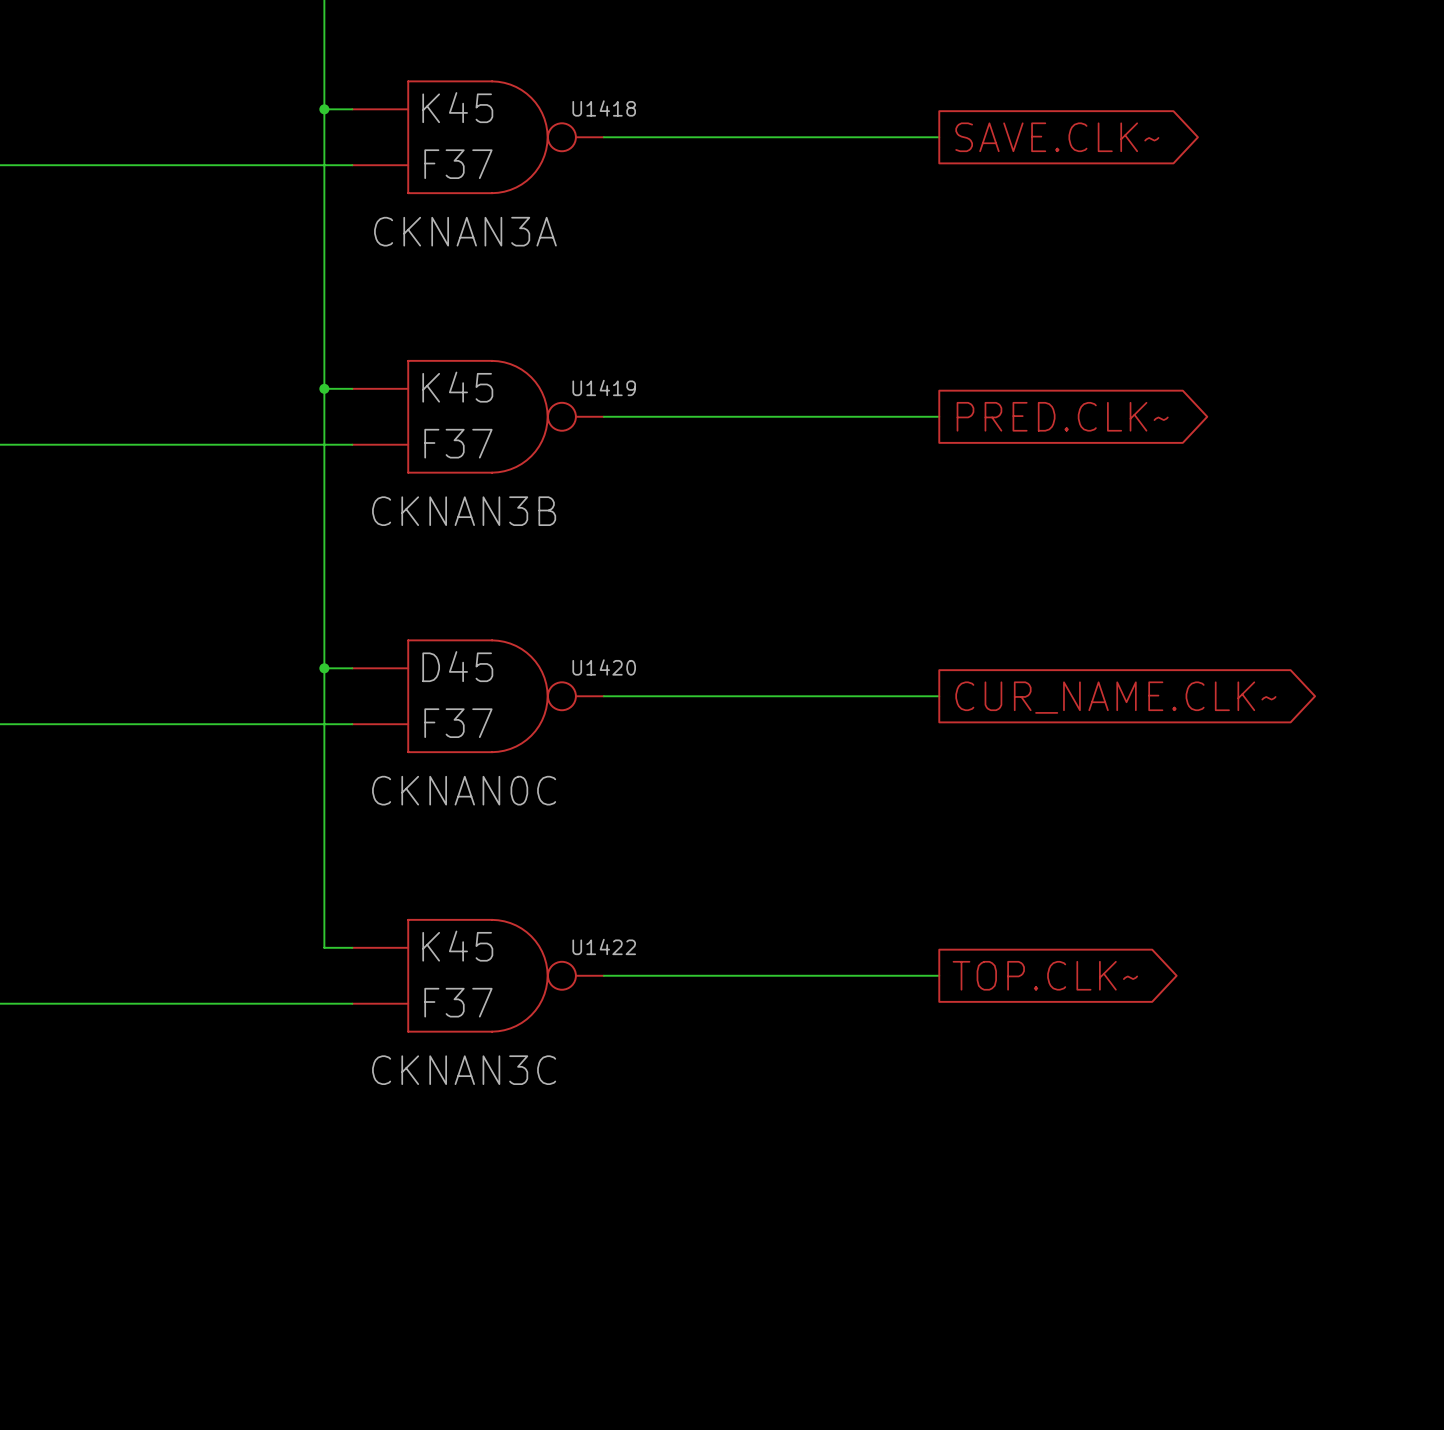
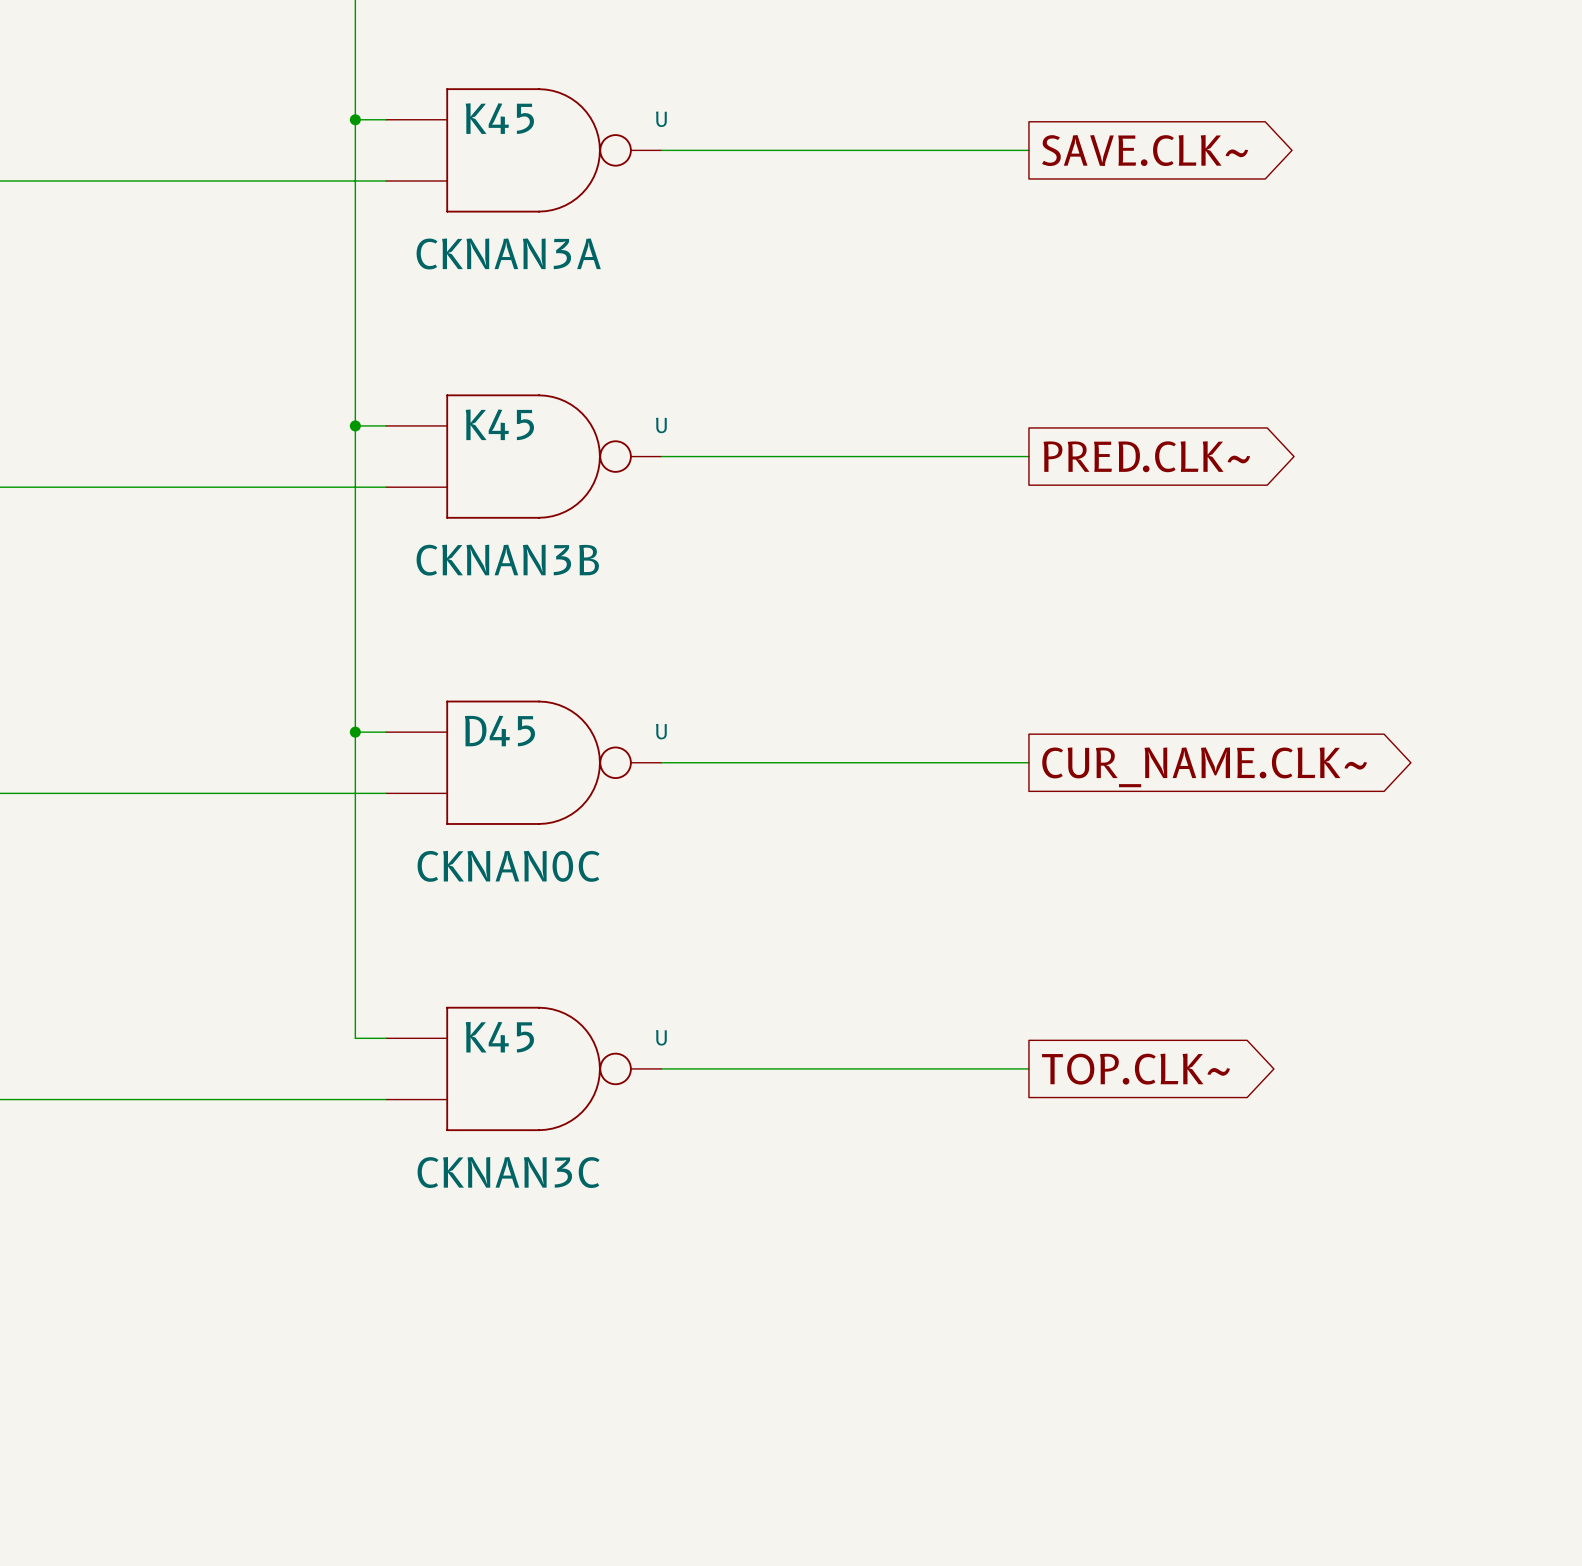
U1418 name: U1418 (604, 108) -> U (661, 119)
U1418 value: F37 (458, 164) -> none
U1419 name: U1419 (604, 387) -> U (661, 425)
U1419 value: F37 (458, 443) -> none
U1420 name: U1420 (604, 667) -> U (661, 731)
U1420 value: F37 (458, 723) -> none
U1422 name: U1422 (604, 946) -> U (661, 1037)
U1422 value: F37 (458, 1002) -> none

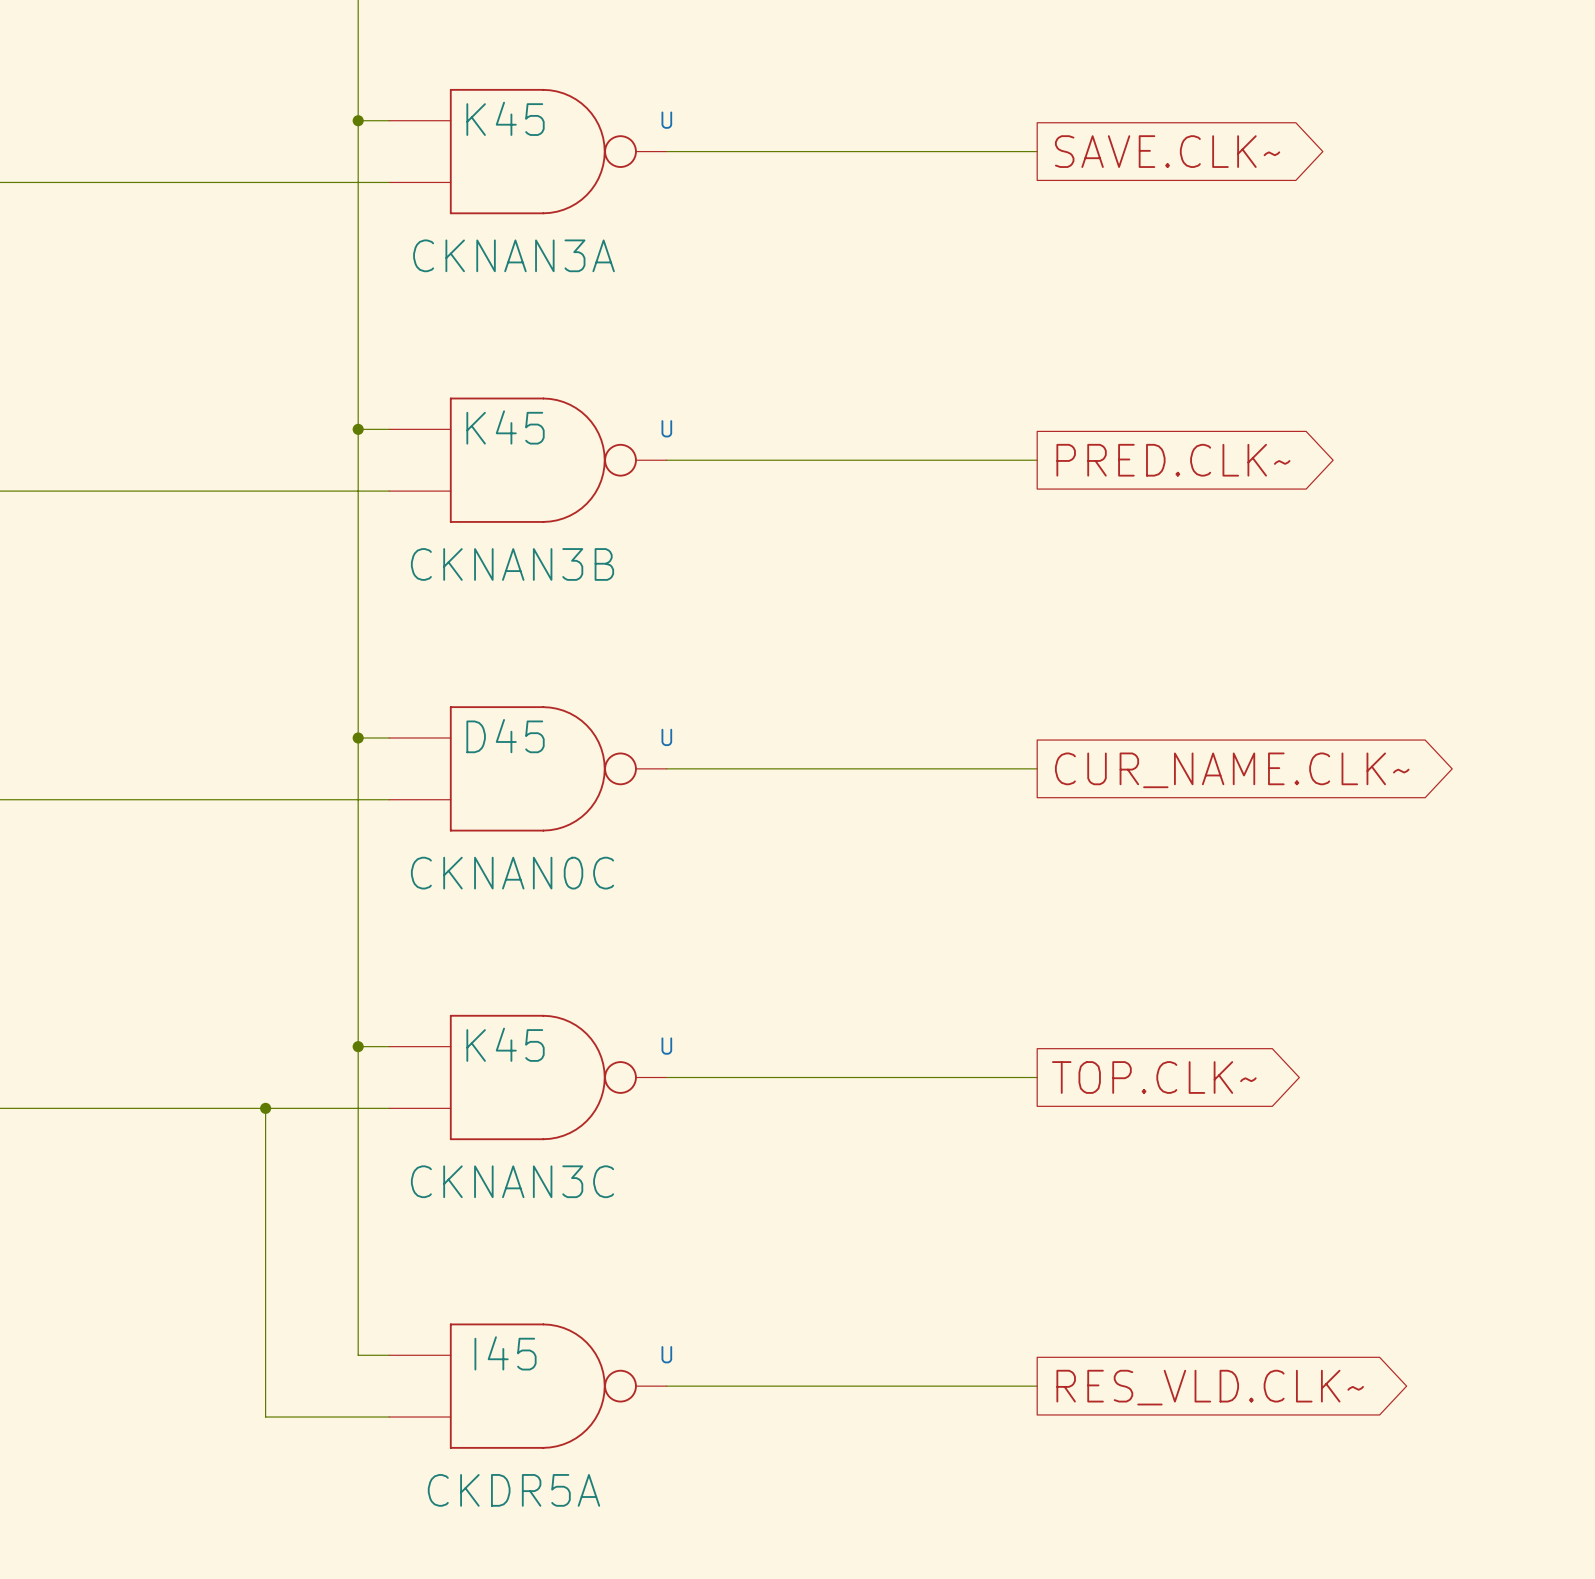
wire: none -> (358, 1046) (358, 1355) (389, 1355)
junction: none -> (358, 1046)
wire: none -> (265, 1108) (265, 1417) (389, 1417)
junction: none -> (265, 1108)
U: none -> (527, 1386)
wire: none -> (666, 1386) (1037, 1386)
global label: none -> RES_VLD.CLK~ (1210, 1387)

